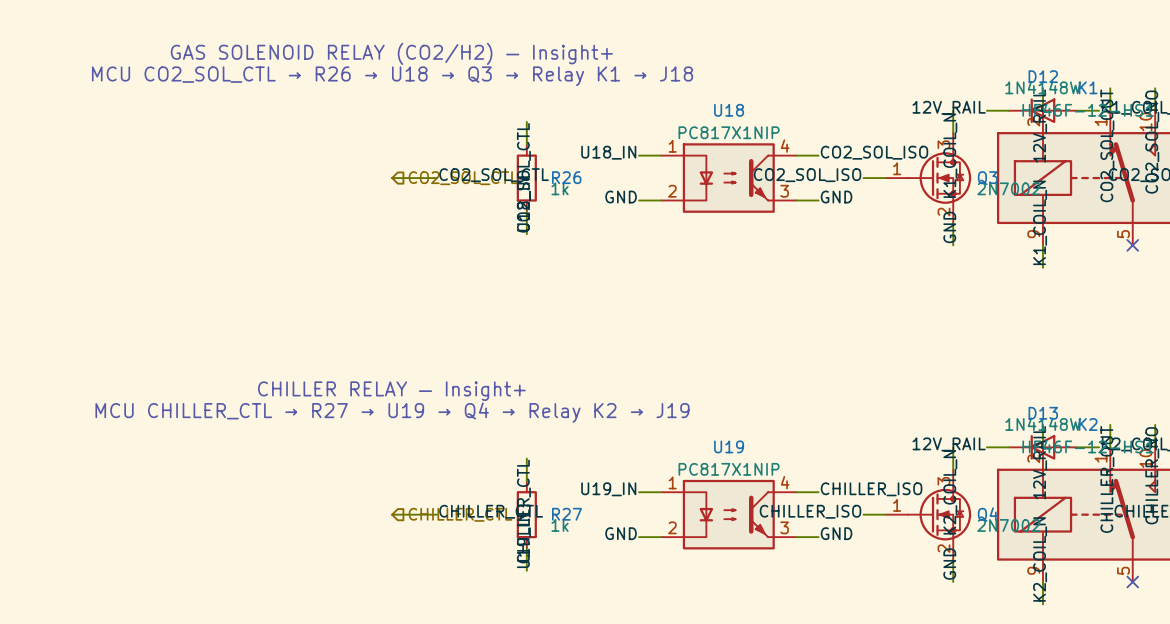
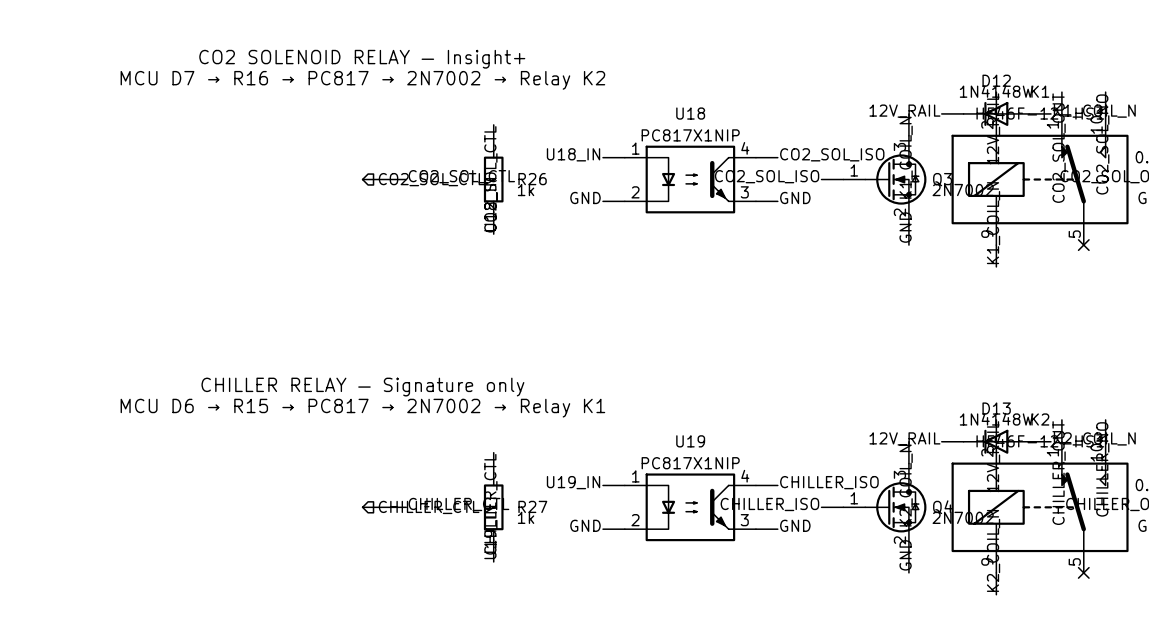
text: GAS SOLENOID RELAY (CO2/H2) — Insight+ (391, 53) -> CO2 SOLENOID RELAY — Insight+ (362, 59)
text: MCU CO2_SOL_CTL → R26 → U18 → Q3 → Relay K1 → J18 (392, 76) -> MCU D7 → R16 → PC817 → 2N7002 → Relay K2 (362, 80)
text: CHILLER RELAY — Insight+ (391, 391) -> CHILLER RELAY — Signature only (362, 387)
text: MCU CHILLER_CTL → R27 → U19 → Q4 → Relay K2 → J19 (392, 412) -> MCU D6 → R15 → PC817 → 2N7002 → Relay K1 (362, 408)

